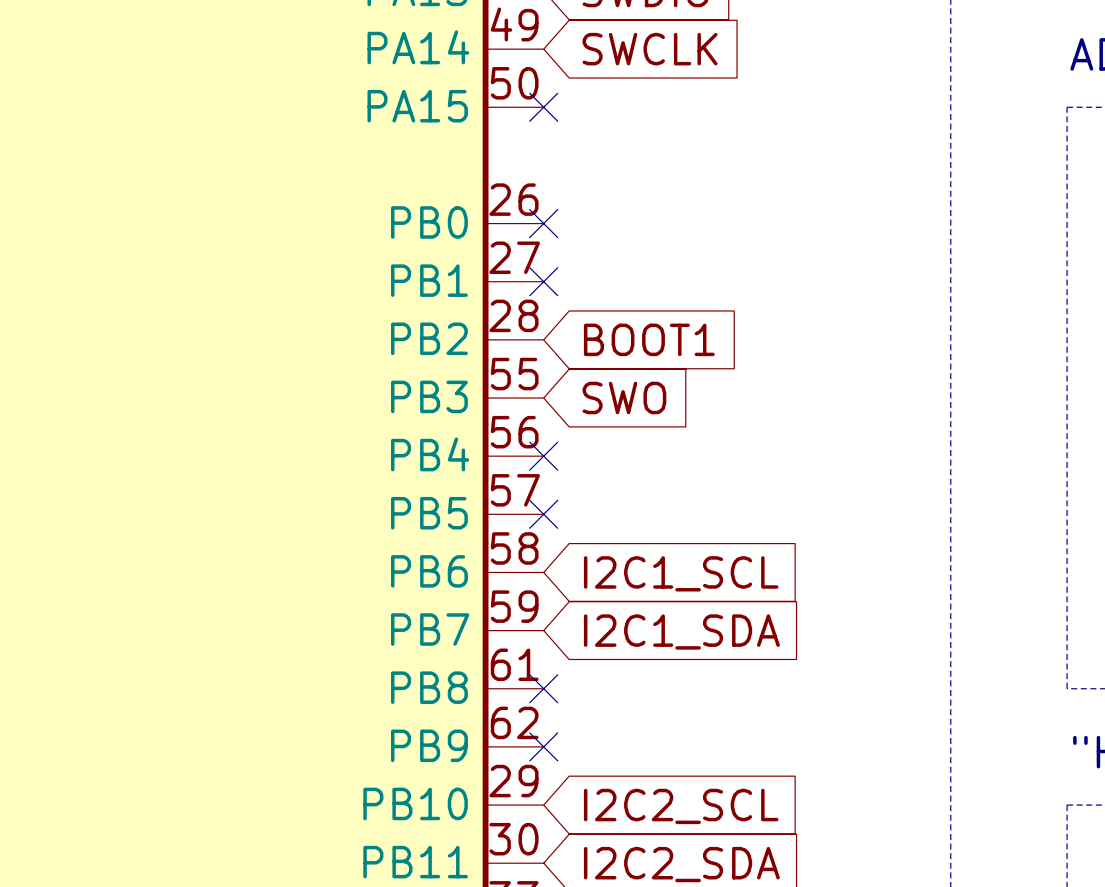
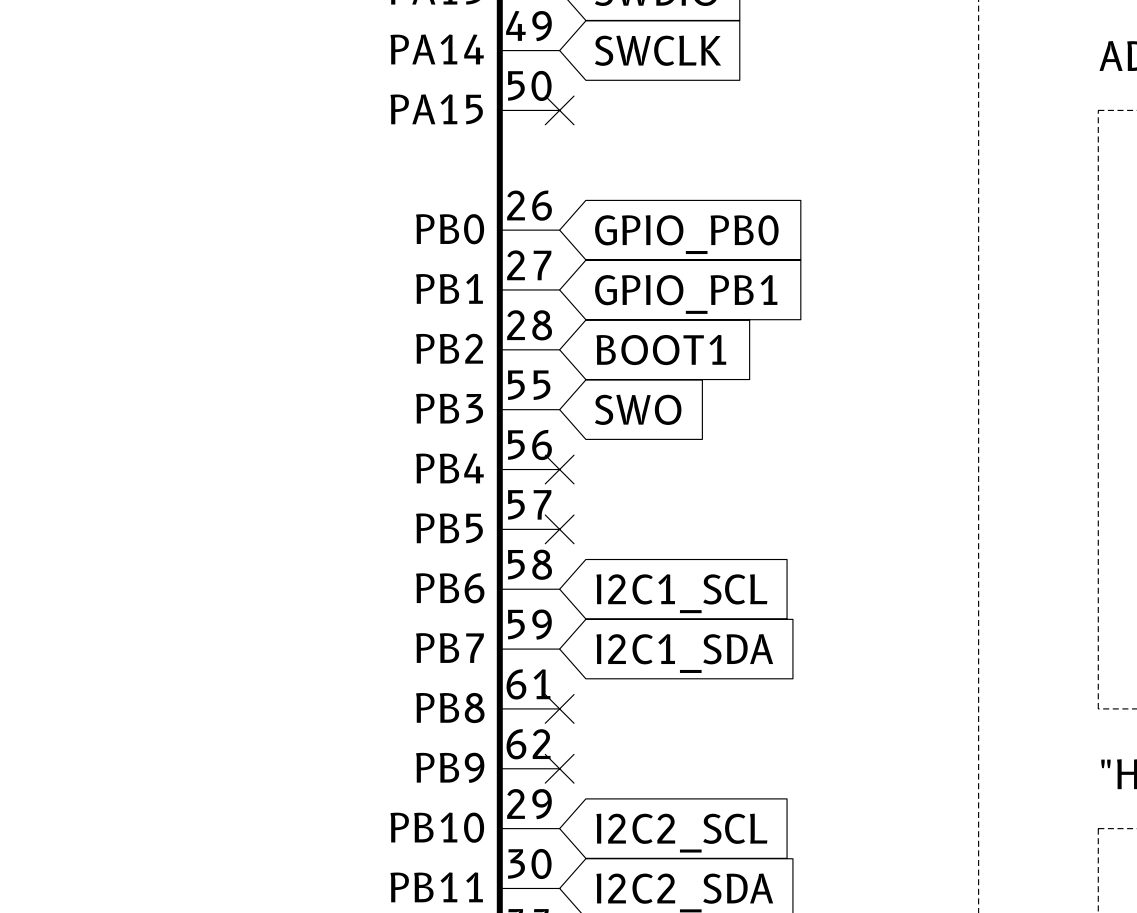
no-connect mark: (543, 223) -> none
global label: none -> GPIO_PB0 (686, 234)
no-connect mark: (543, 281) -> none
global label: none -> GPIO_PB1 (686, 294)

